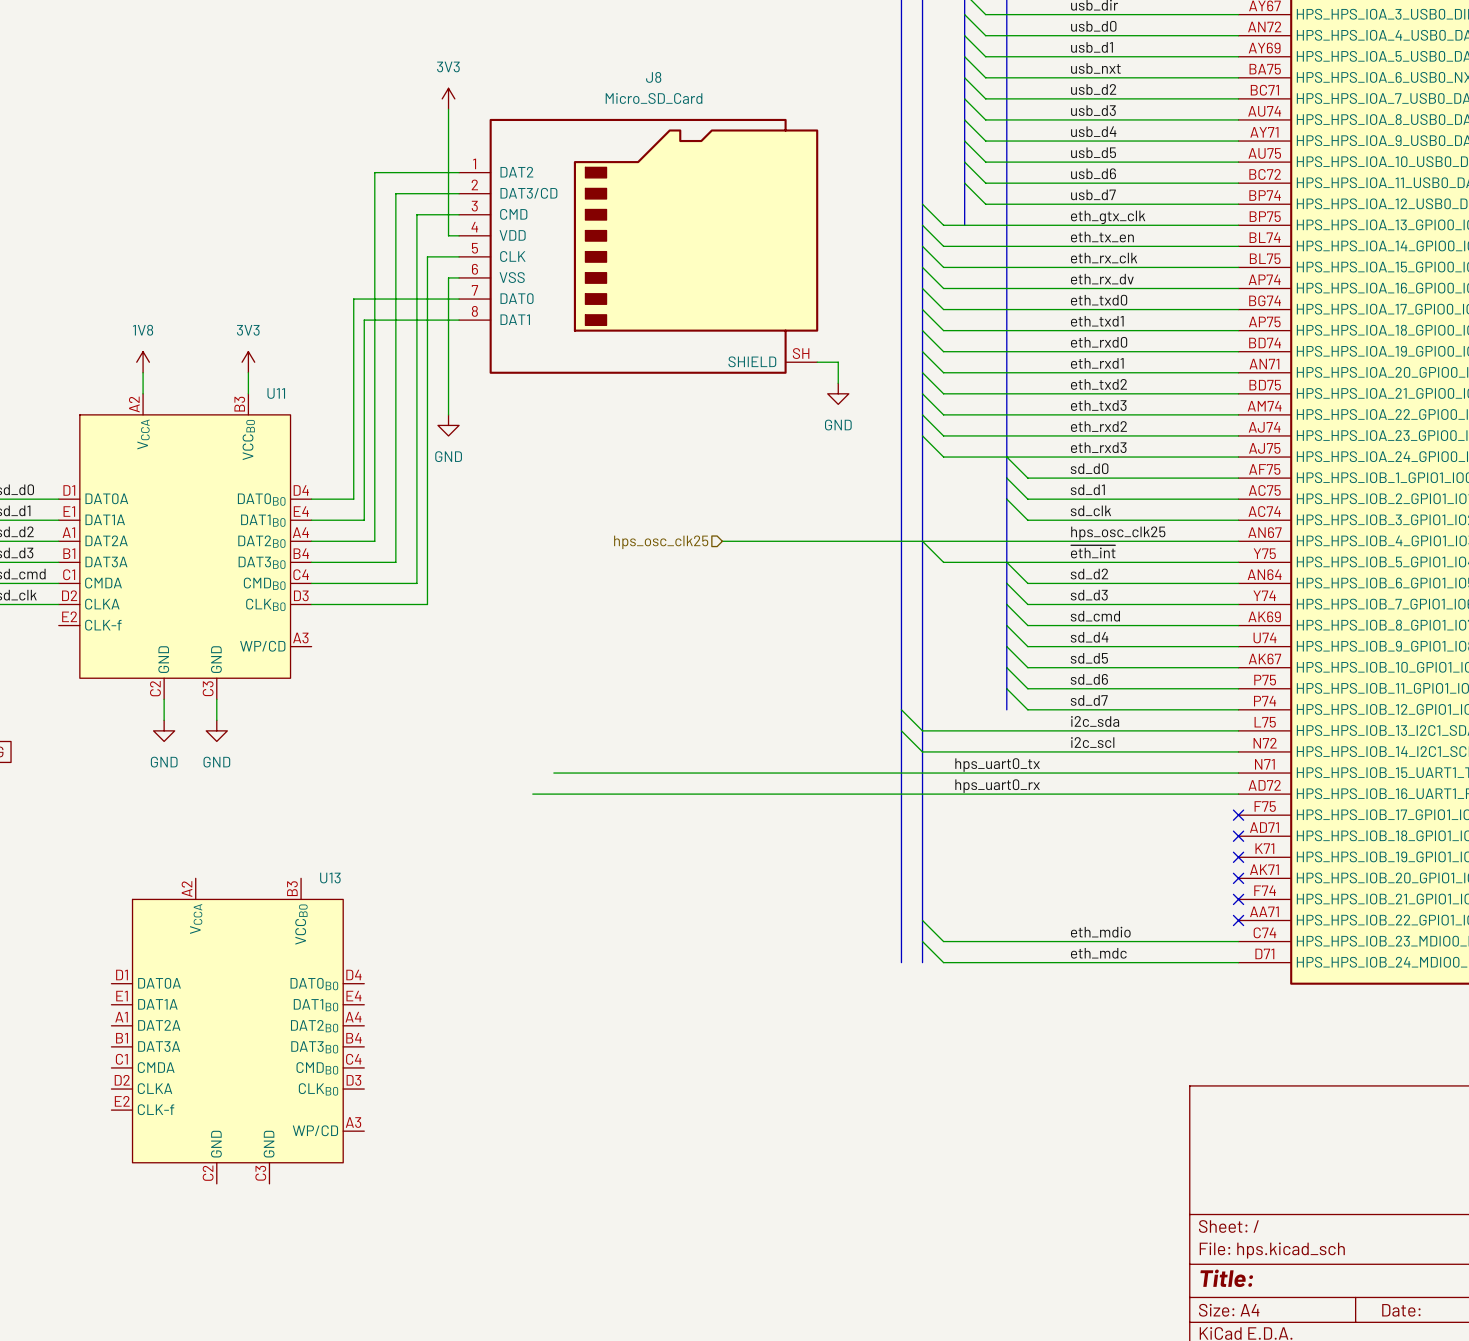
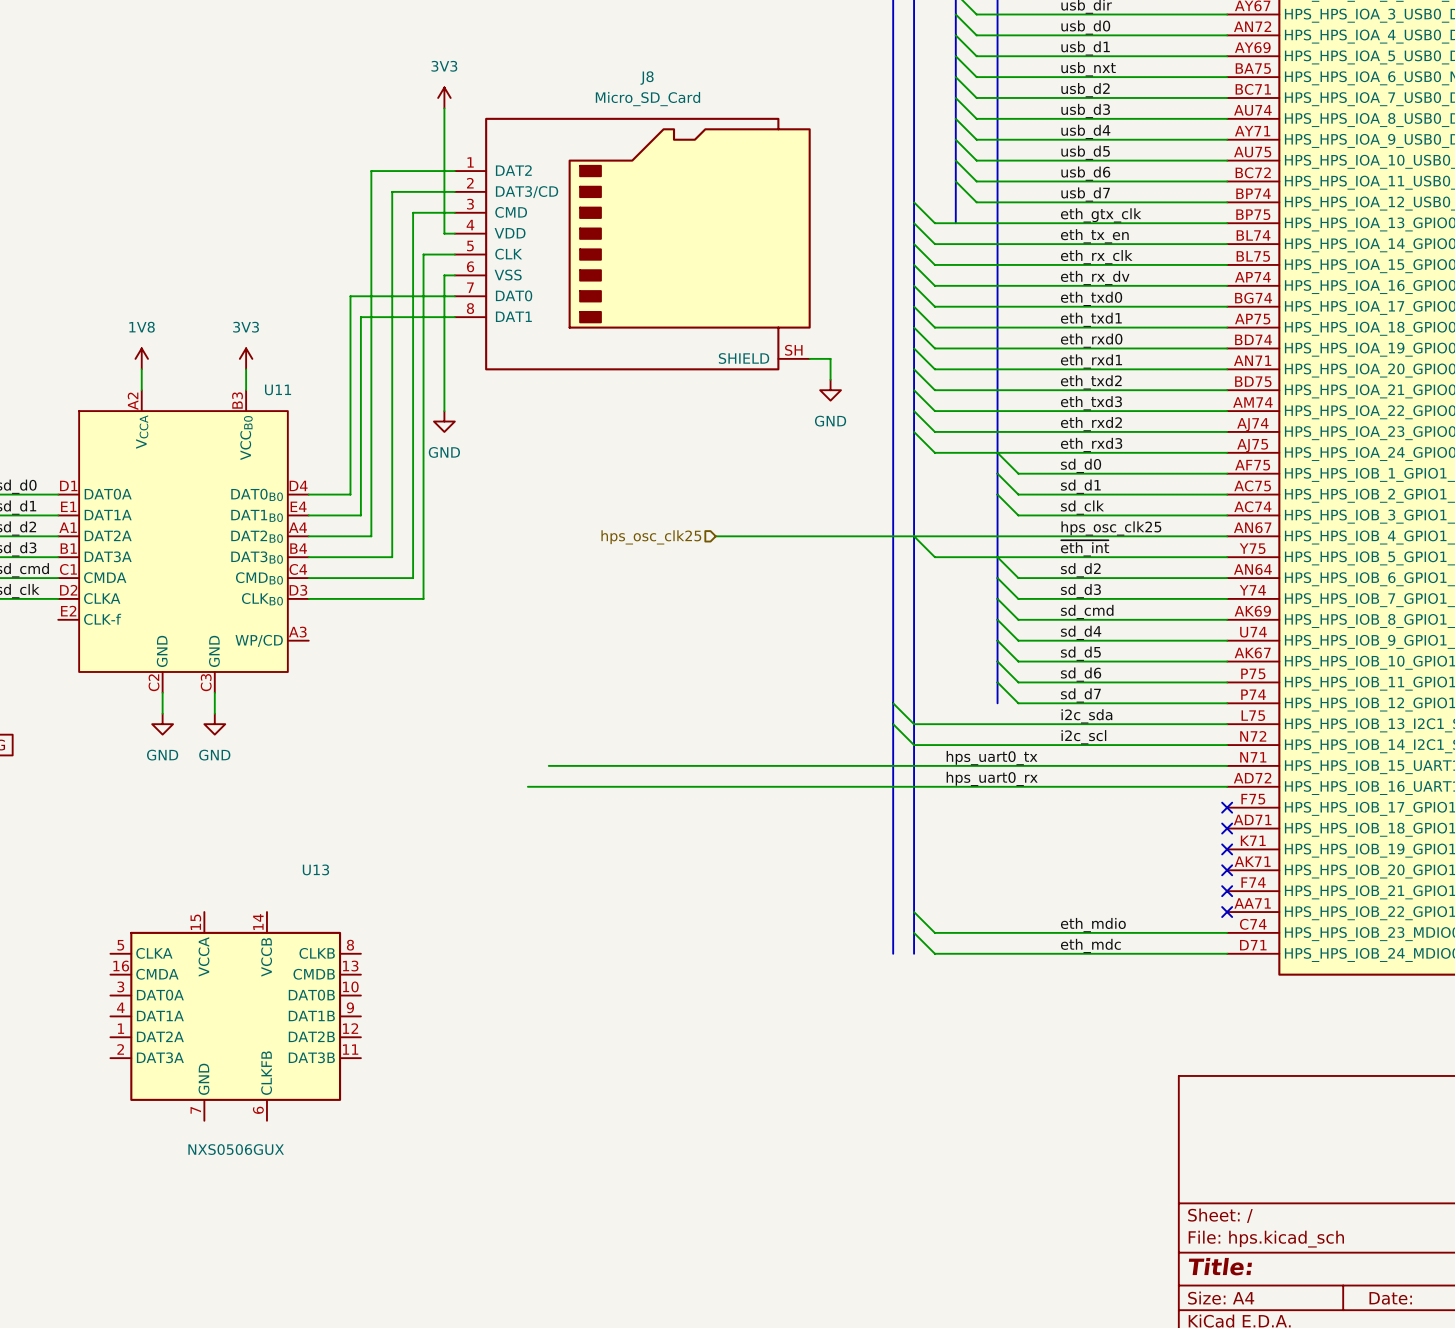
U13 symbol: [111, 878, 365, 1184] -> [110, 912, 361, 1121]
U13 name position: U13 (330, 878) -> U13 (315, 869)
U13 value: none -> NXS0506GUX (236, 1149)

